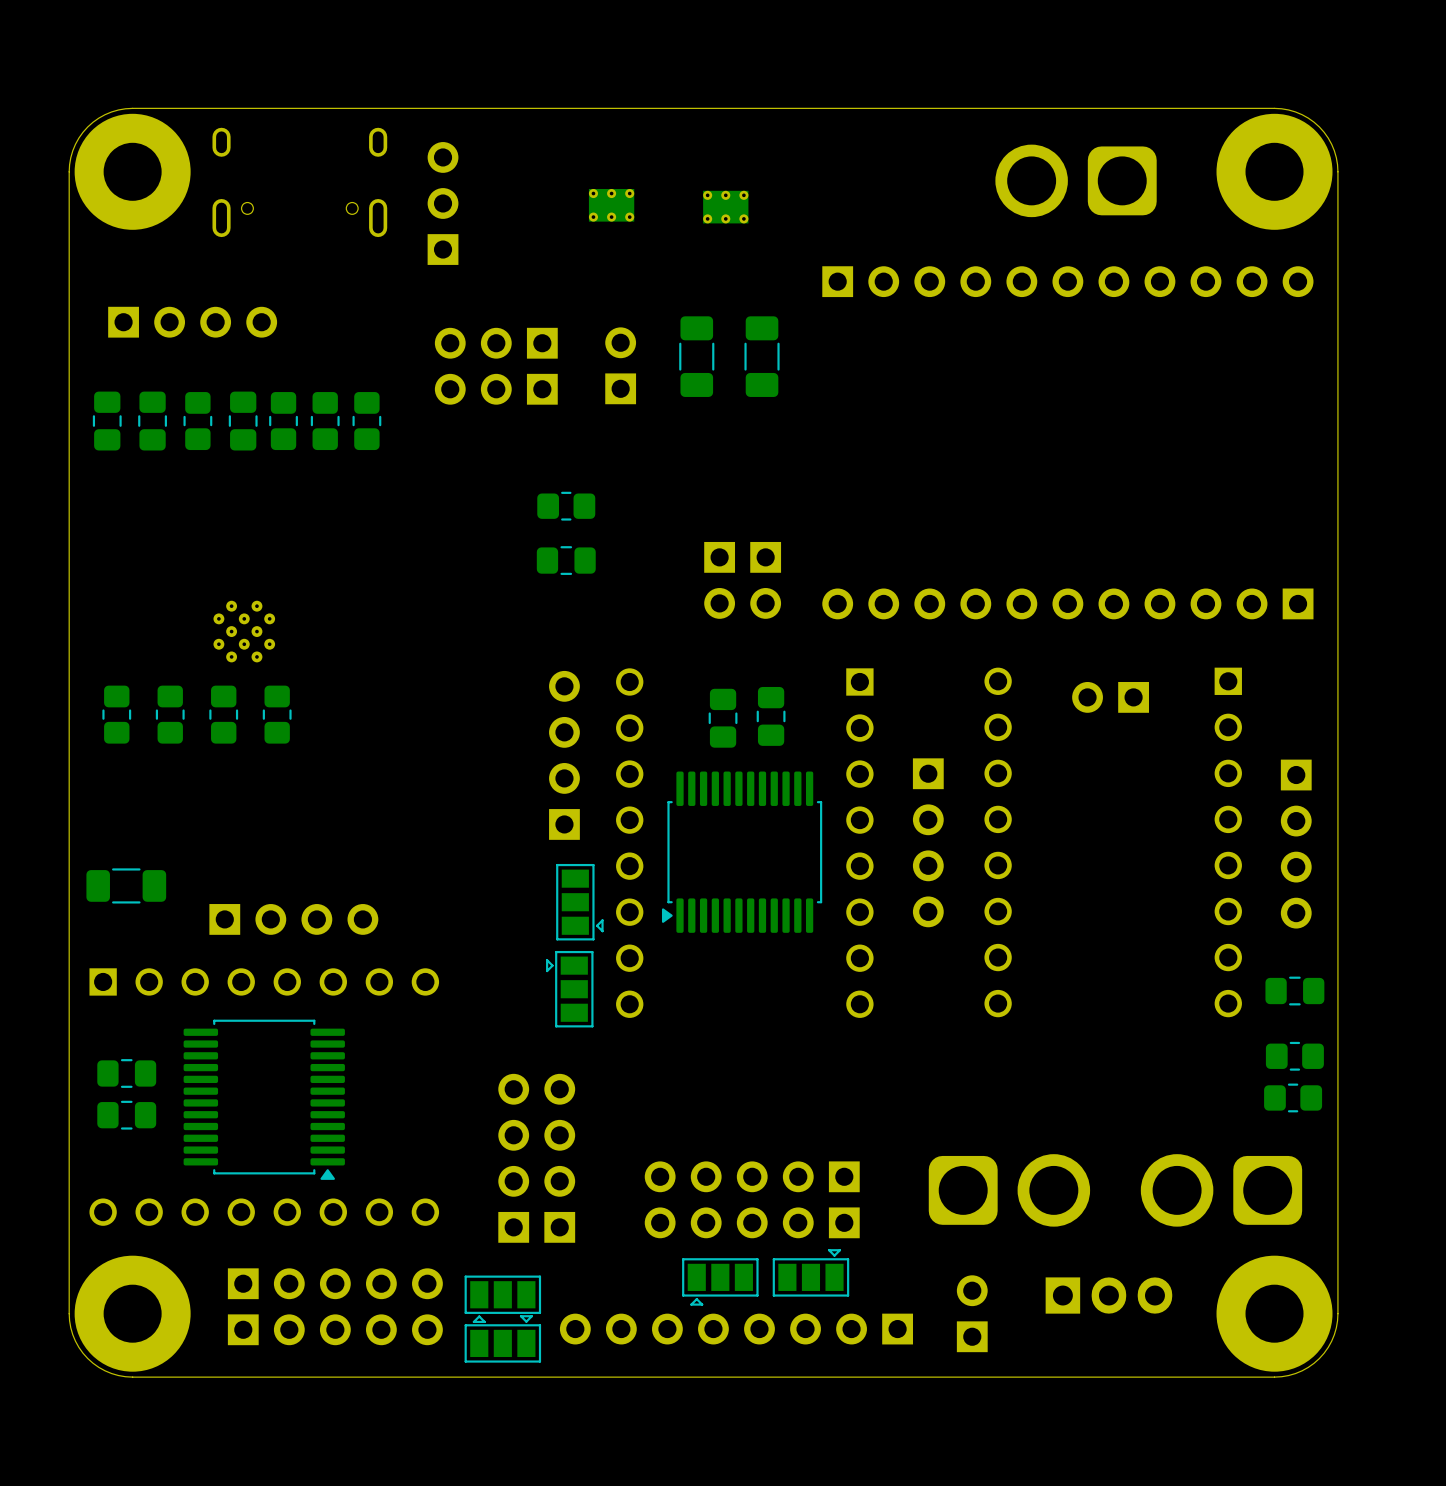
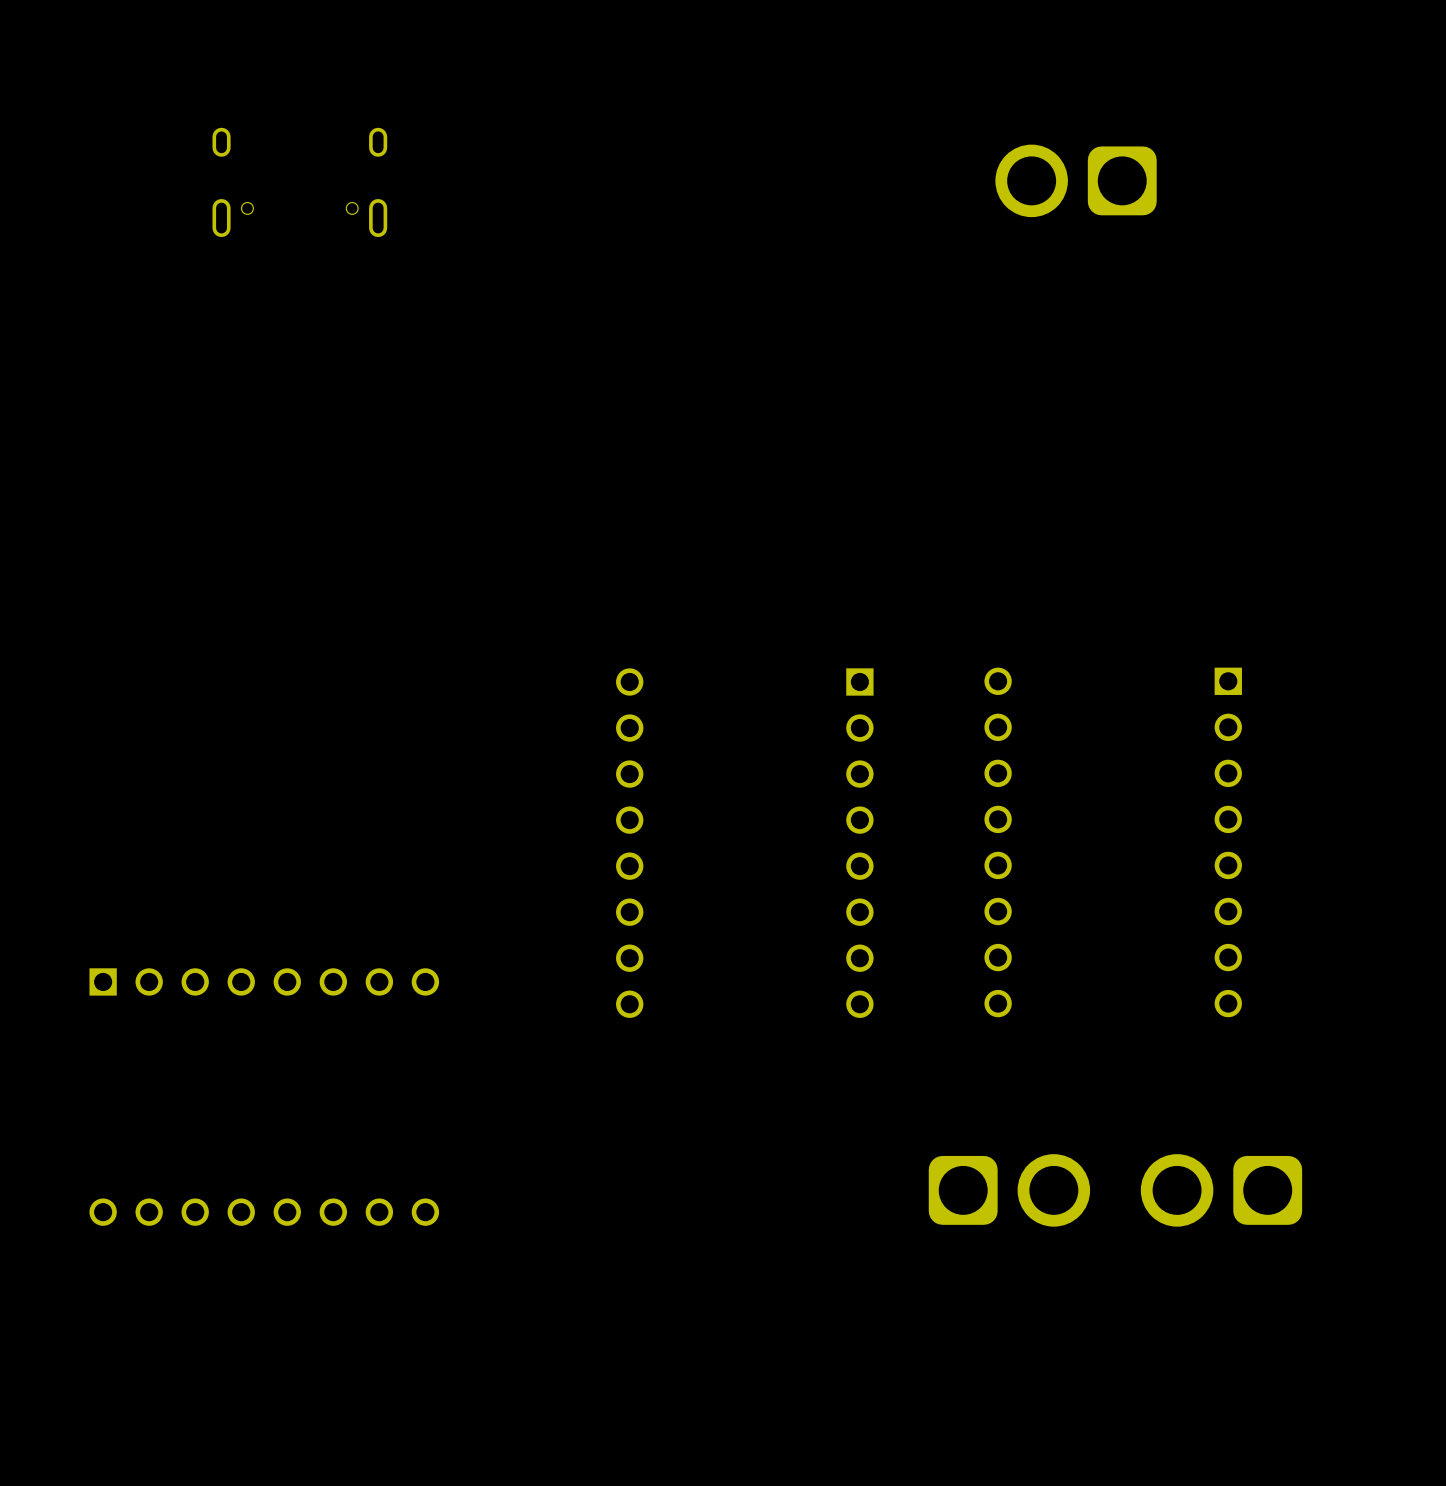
board edge: (1274, 108) (132, 108) (111, 111) (98, 118) (87, 126) (75, 144) (70, 157) (69, 171) (69, 1313) (72, 1334) (78, 1347) (87, 1358) (105, 1370) (118, 1375) (132, 1377) (1274, 1377) (1295, 1373) (1308, 1367) (1319, 1358) (1331, 1341) (1336, 1327) (1337, 1313) (1337, 171) (1334, 150) (1328, 138) (1319, 126) (1308, 118) (1295, 111) (1274, 108) -> none
part: (132, 171) -> none
part: (1274, 171) -> none
part: (443, 203) -> none
part: (611, 205) -> none
part: (725, 207) -> none
part: (1067, 281) -> none
part: (192, 322) -> none
part: (496, 343) -> none
part: (696, 356) -> none
part: (762, 356) -> none
part: (620, 365) -> none
part: (496, 389) -> none
part: (107, 421) -> none
part: (152, 421) -> none
part: (197, 421) -> none
part: (243, 421) -> none
part: (283, 421) -> none
part: (325, 421) -> none
part: (366, 421) -> none
part: (566, 506) -> none
part: (566, 560) -> none
part: (719, 580) -> none
part: (765, 580) -> none
part: (1067, 603) -> none
part: (244, 631) -> none
part: (1110, 697) -> none
part: (116, 714) -> none
part: (170, 714) -> none
part: (223, 714) -> none
part: (277, 714) -> none
part: (771, 716) -> none
part: (723, 718) -> none
part: (564, 755) -> none
part: (928, 842) -> none
part: (1296, 844) -> none
part: (742, 852) -> none
part: (126, 885) -> none
part: (579, 902) -> none
part: (293, 919) -> none
part: (569, 989) -> none
part: (1294, 991) -> none
part: (1294, 1056) -> none
part: (126, 1073) -> none
part: (1293, 1097) -> none
part: (264, 1099) -> none
part: (126, 1115) -> none
part: (513, 1158) -> none
part: (559, 1158) -> none
part: (752, 1176) -> none
part: (752, 1222) -> none
part: (810, 1272) -> none
part: (720, 1281) -> none
part: (335, 1283) -> none
part: (1108, 1295) -> none
part: (502, 1299) -> none
part: (132, 1313) -> none
part: (972, 1313) -> none
part: (1274, 1313) -> none
part: (335, 1329) -> none
part: (736, 1329) -> none
part: (502, 1338) -> none

